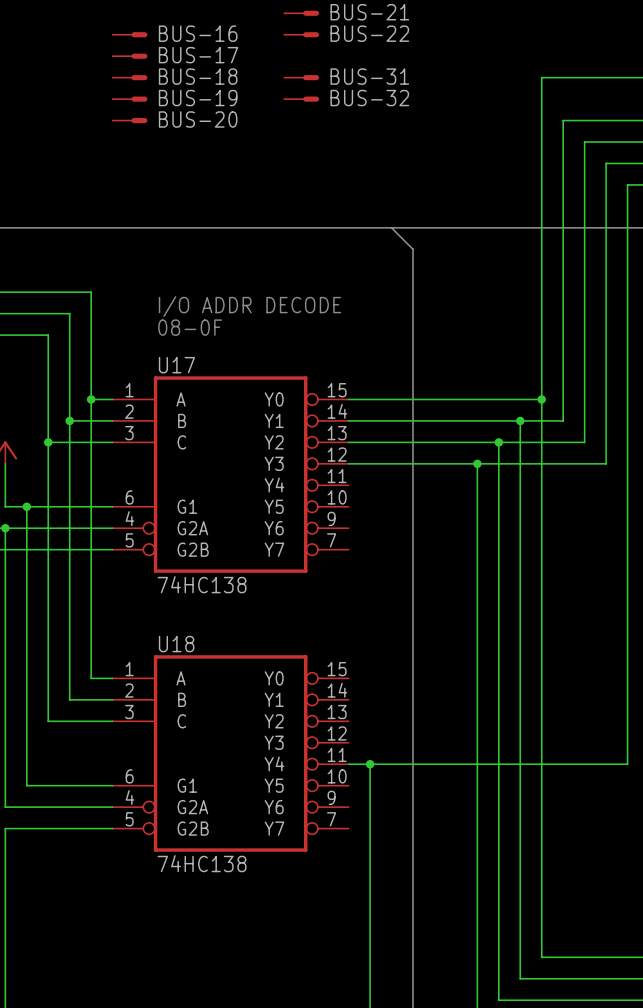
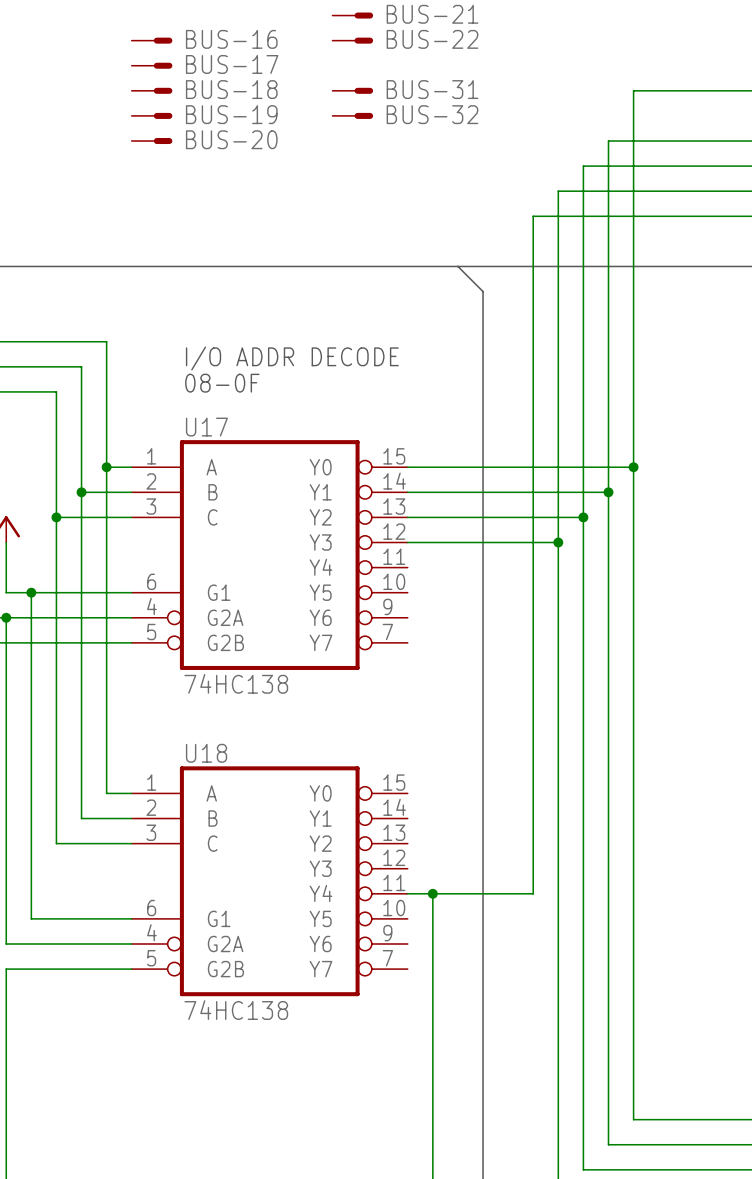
wire: (563, 120) (563, 420) (520, 420) -> (658, 141) (608, 141) (608, 492)
wire: (584, 142) (584, 442) (498, 442) -> (683, 166) (583, 166) (583, 517)
wire: (606, 163) (606, 463) (477, 463) -> (708, 191) (558, 191) (558, 542)
wire: (627, 184) (627, 764) (455, 764) -> (733, 216) (533, 216) (533, 893)

